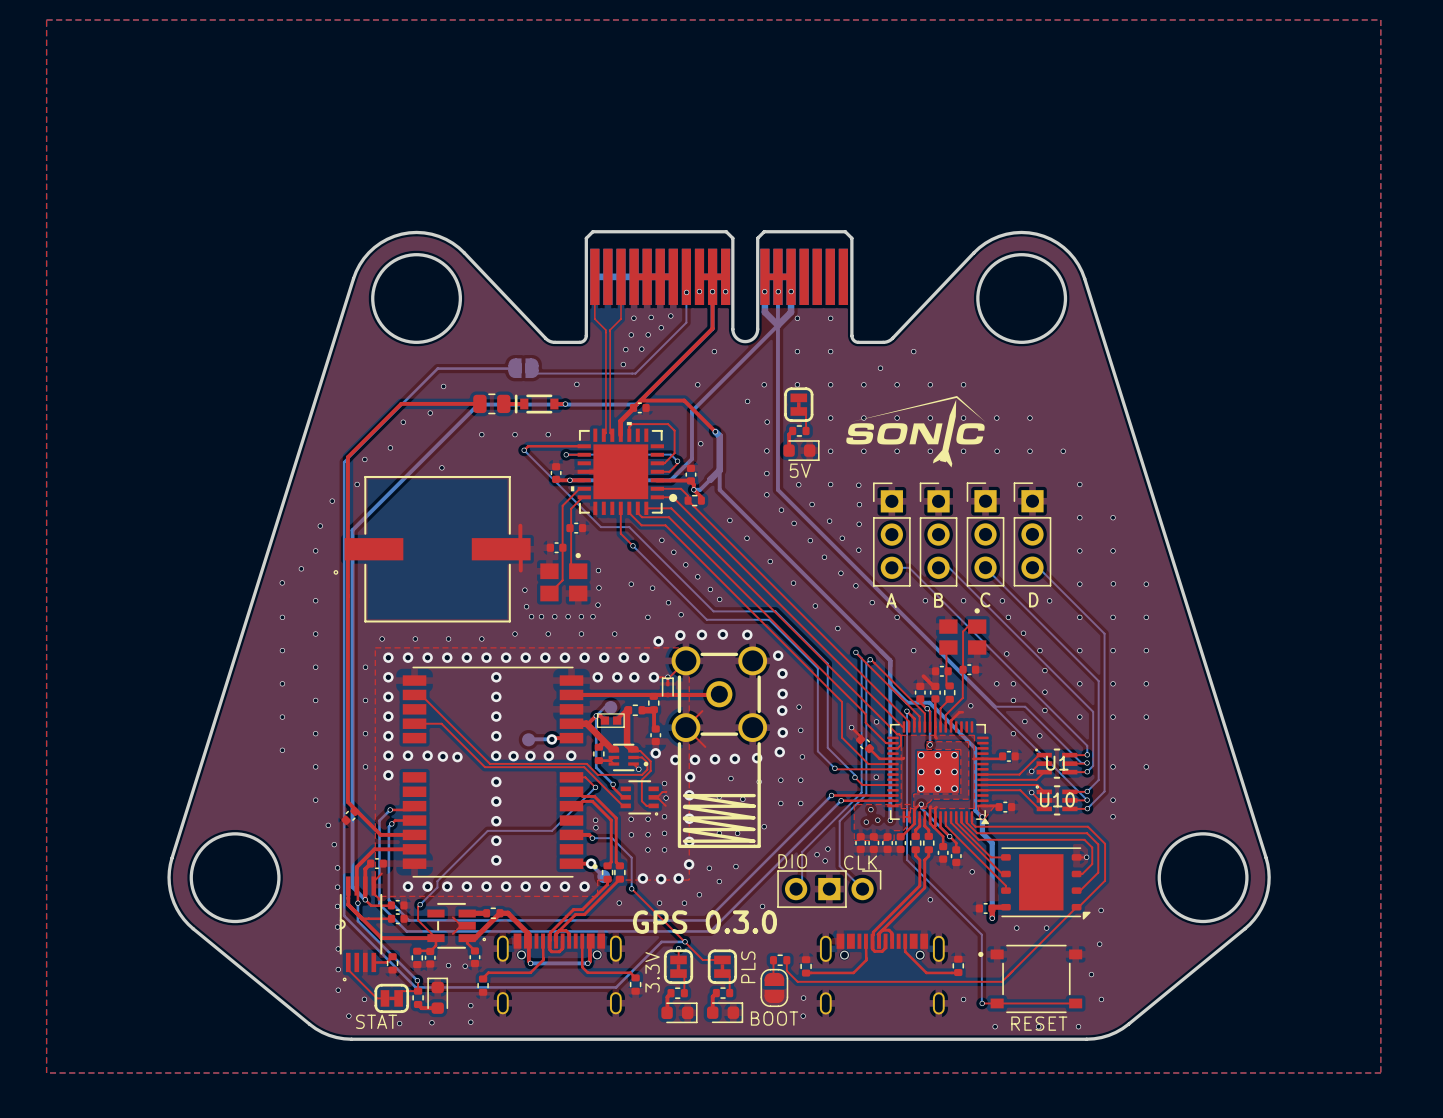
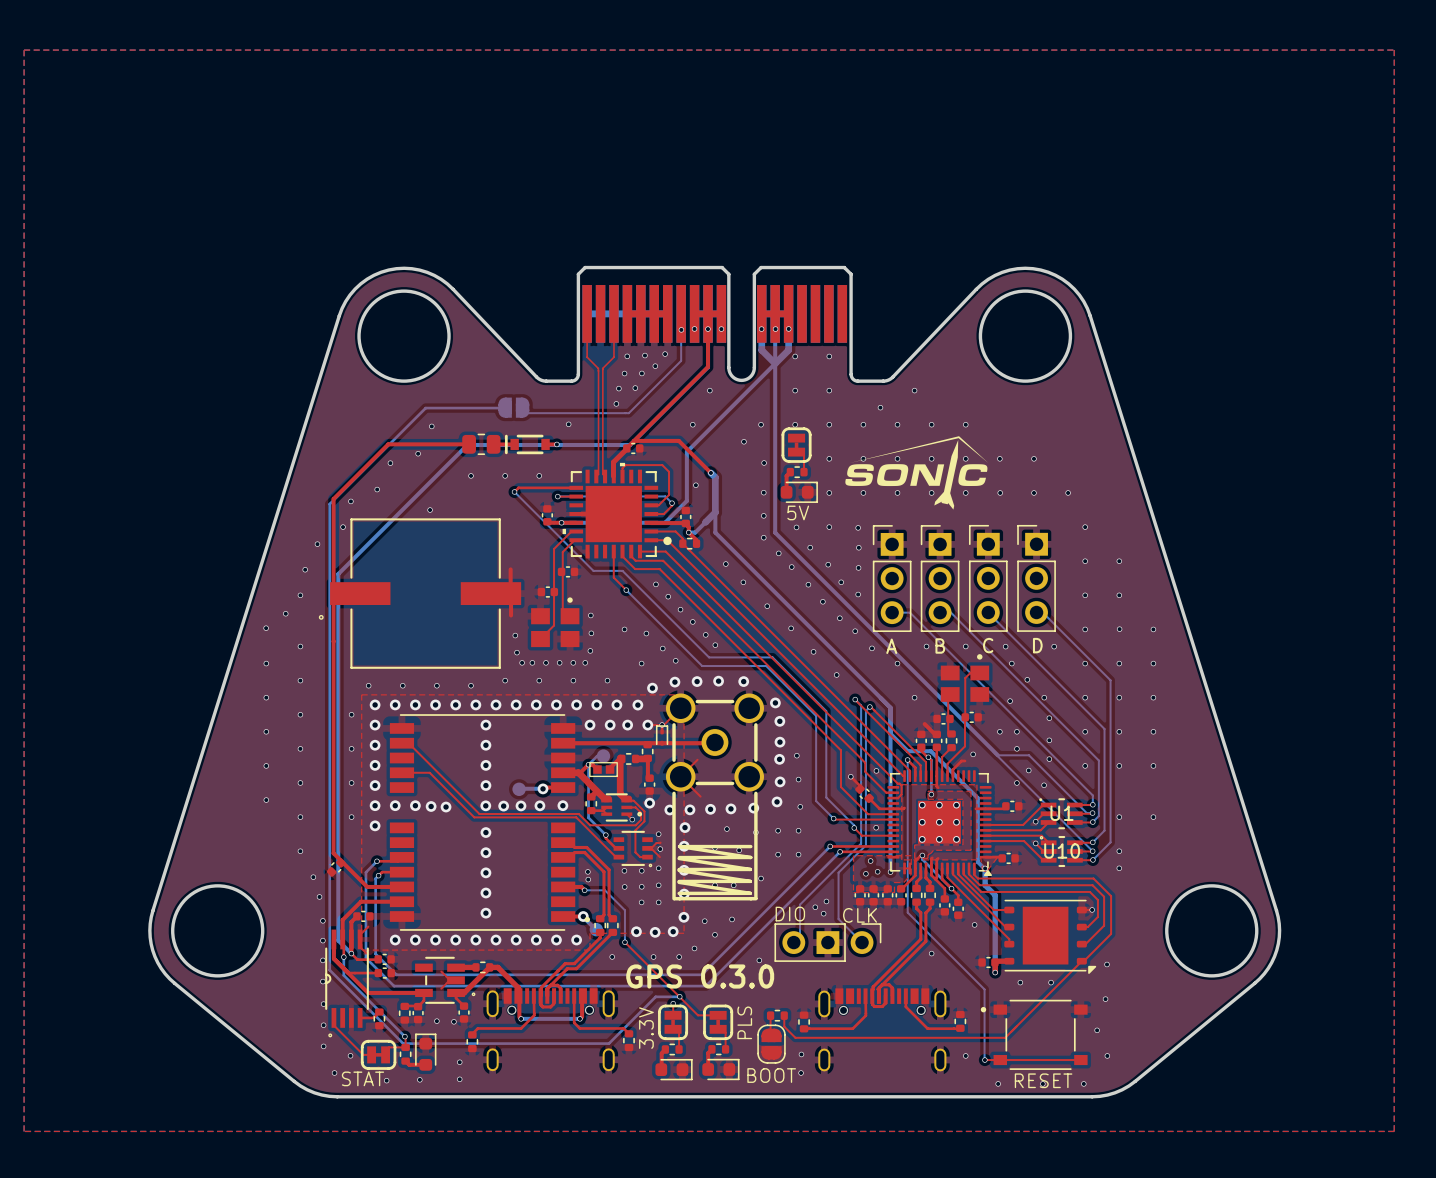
top track: (571, 777) (585, 777) (595, 787) -> none
bottom track: (595, 787) (552, 830) (487, 830) (437, 881) (437, 887) (420, 904) -> none
via: (595, 787) -> none
top track: (420, 904) (418, 906) (418, 920) (435, 938) -> none
via: (420, 904) -> none

